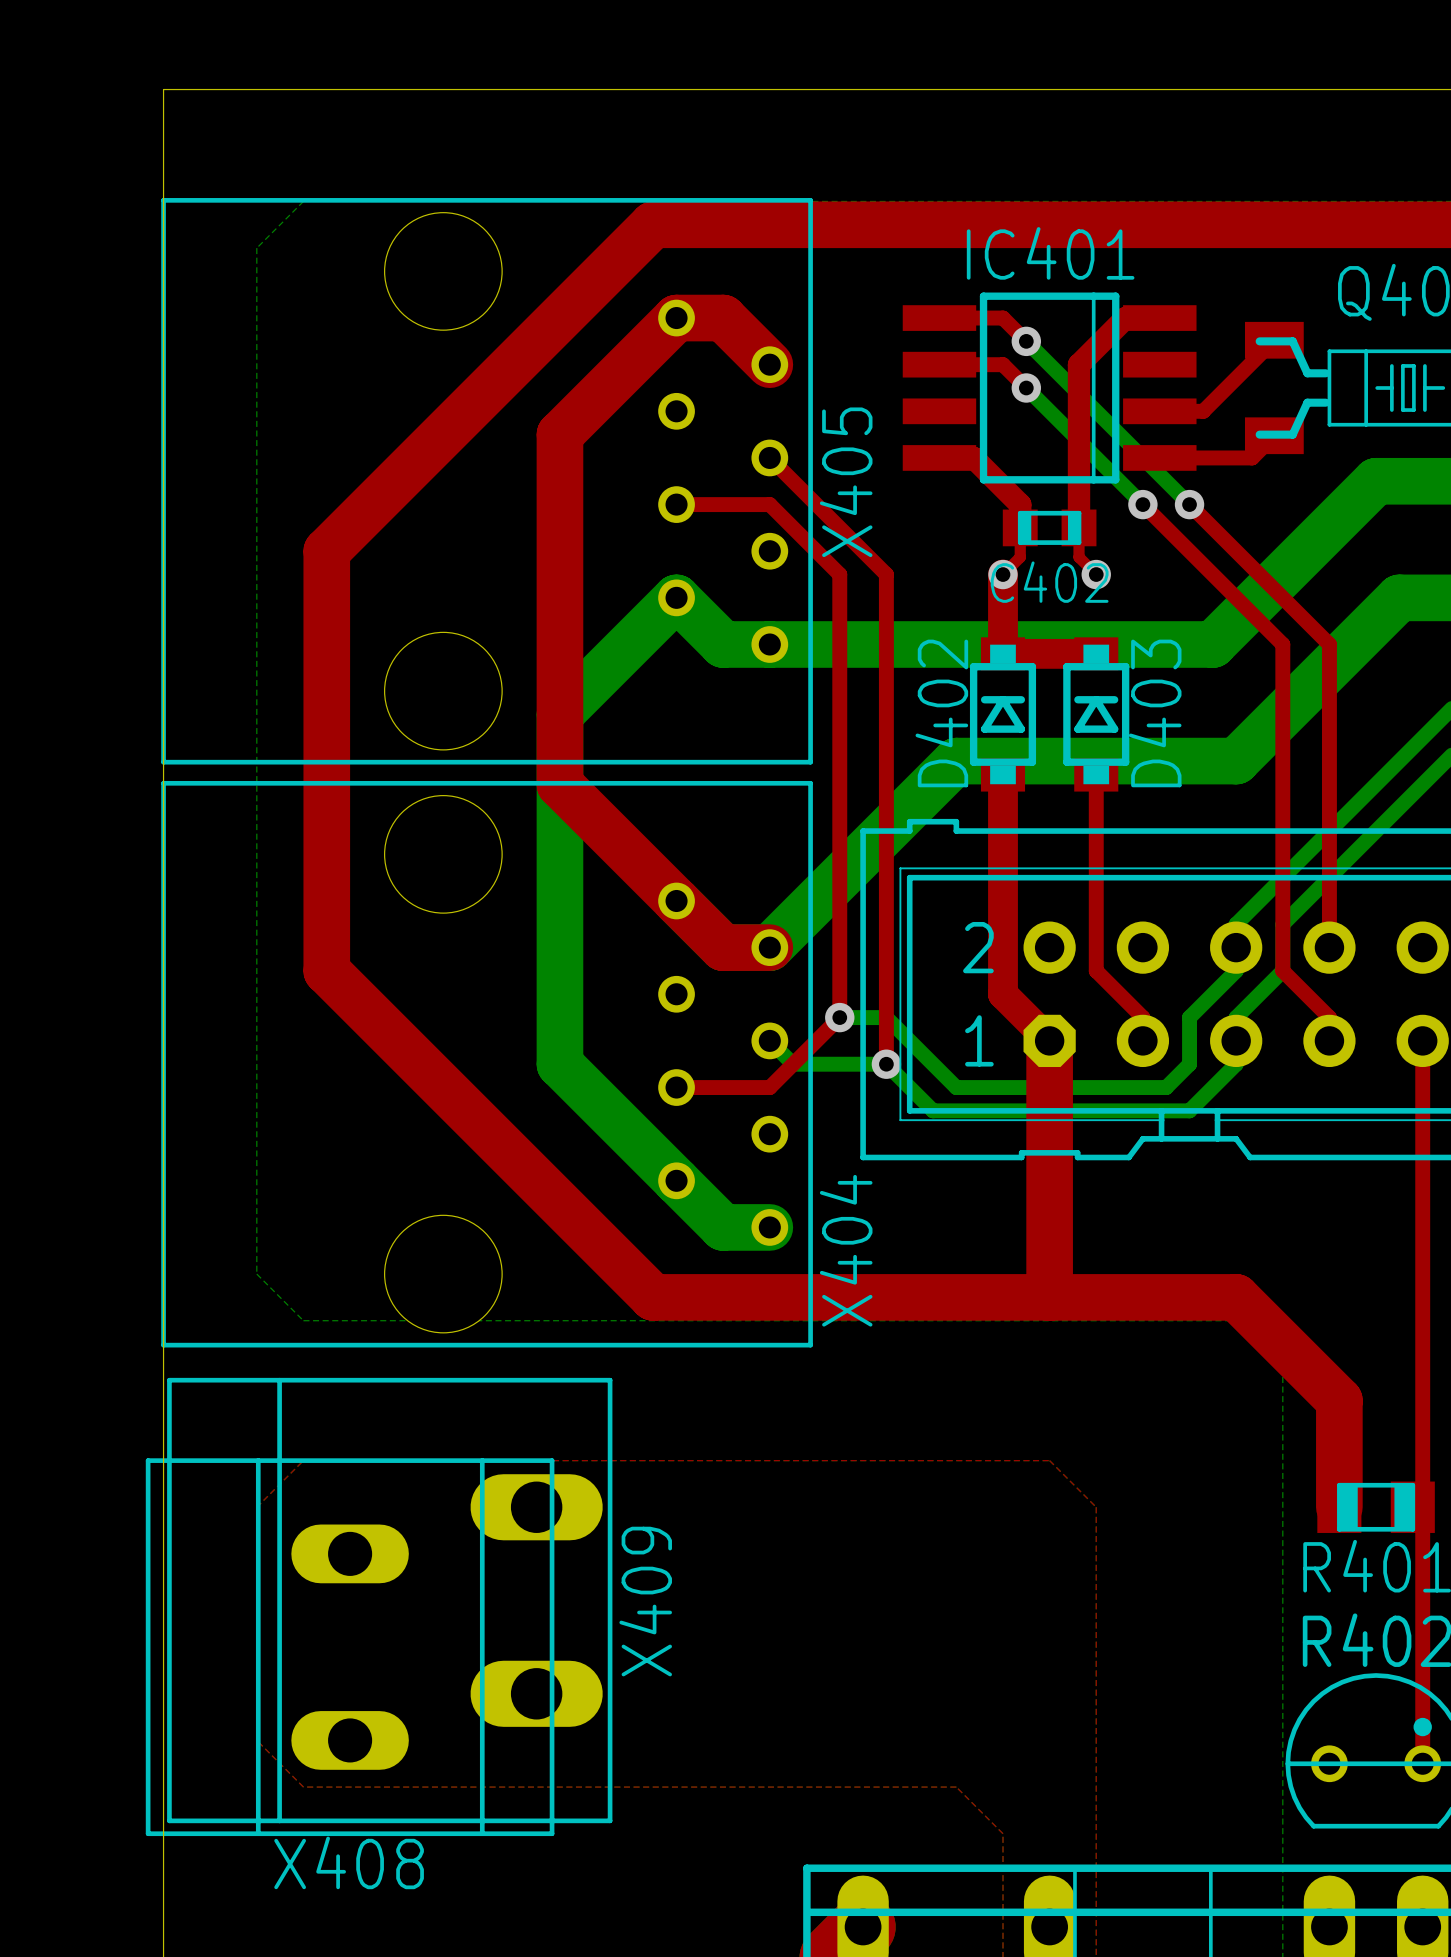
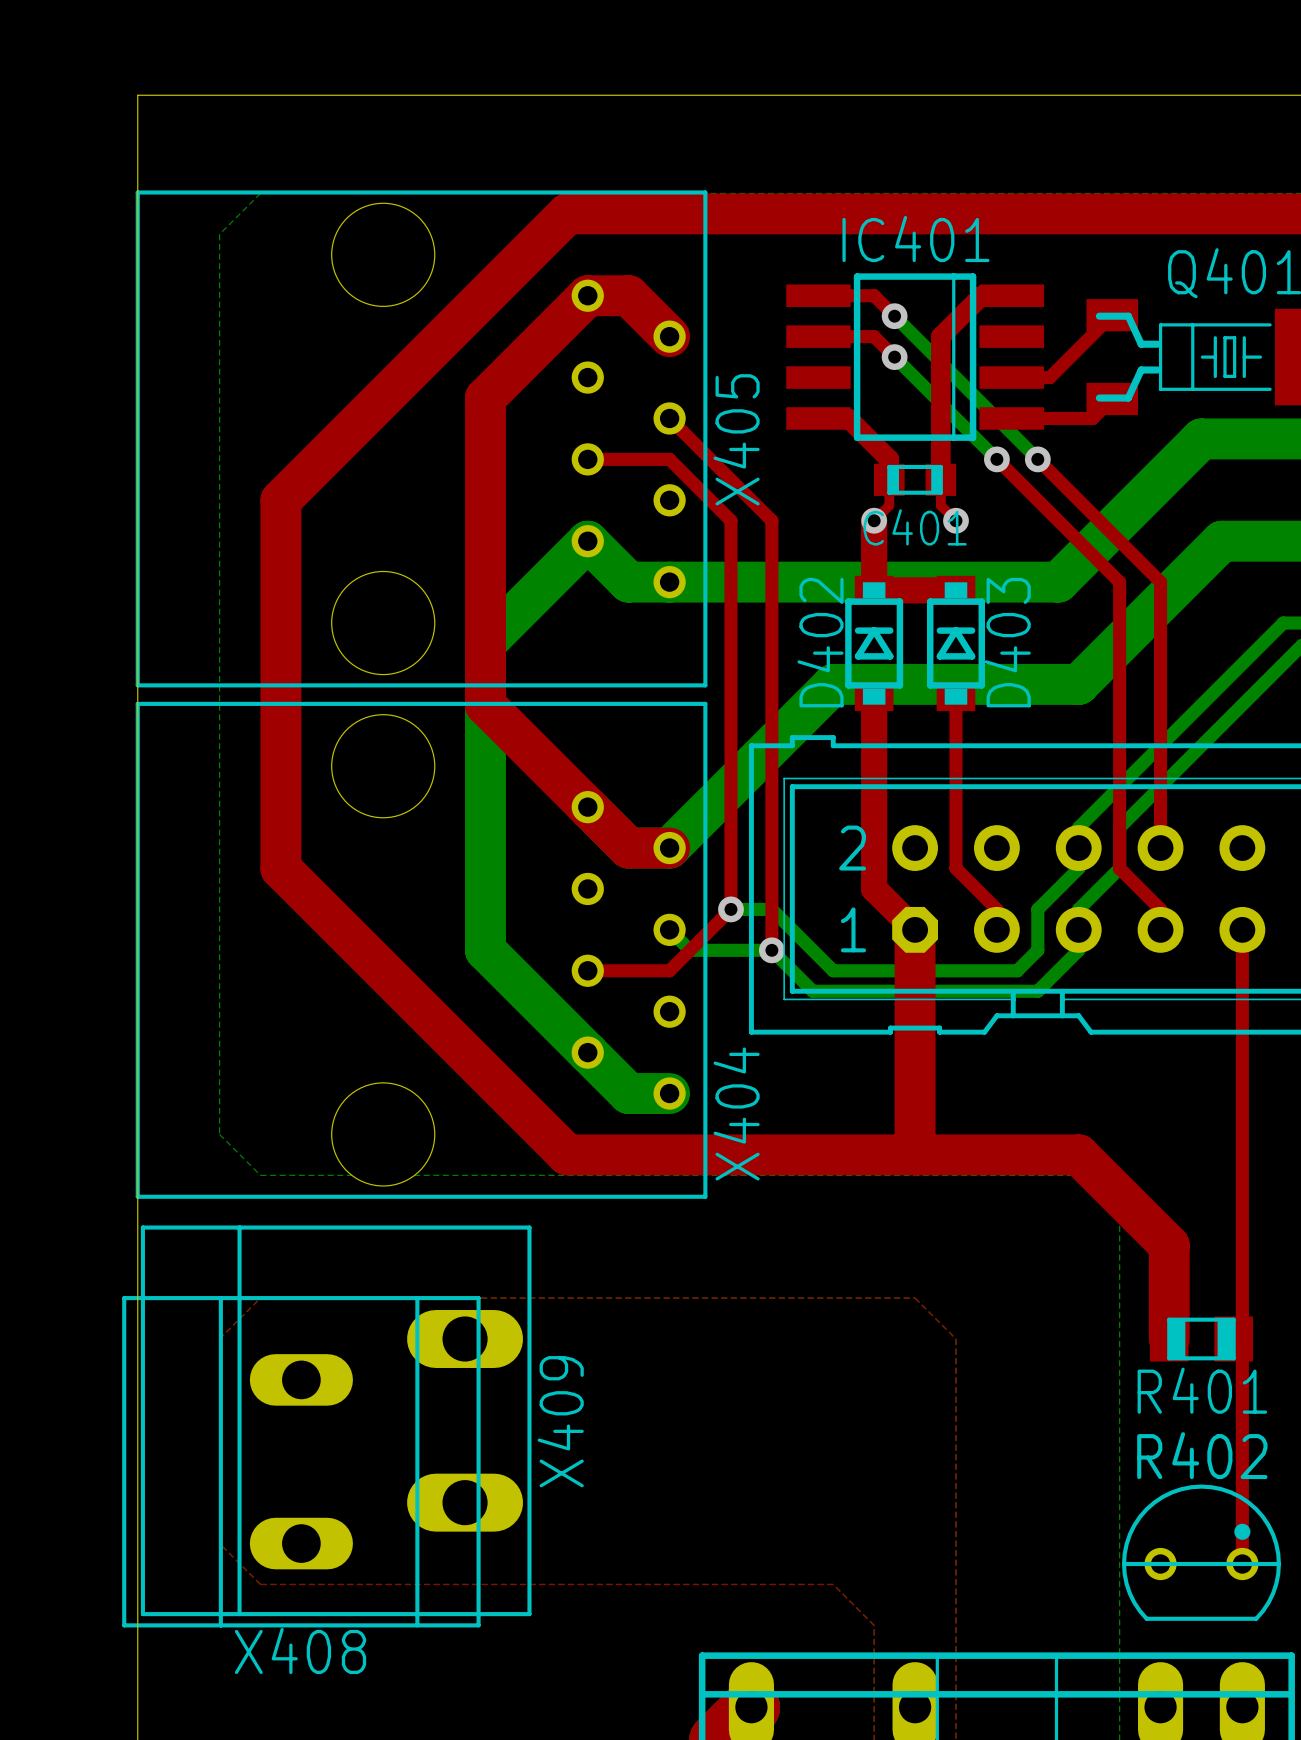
C402 name: C402 (1049, 582) -> C401 (915, 527)

